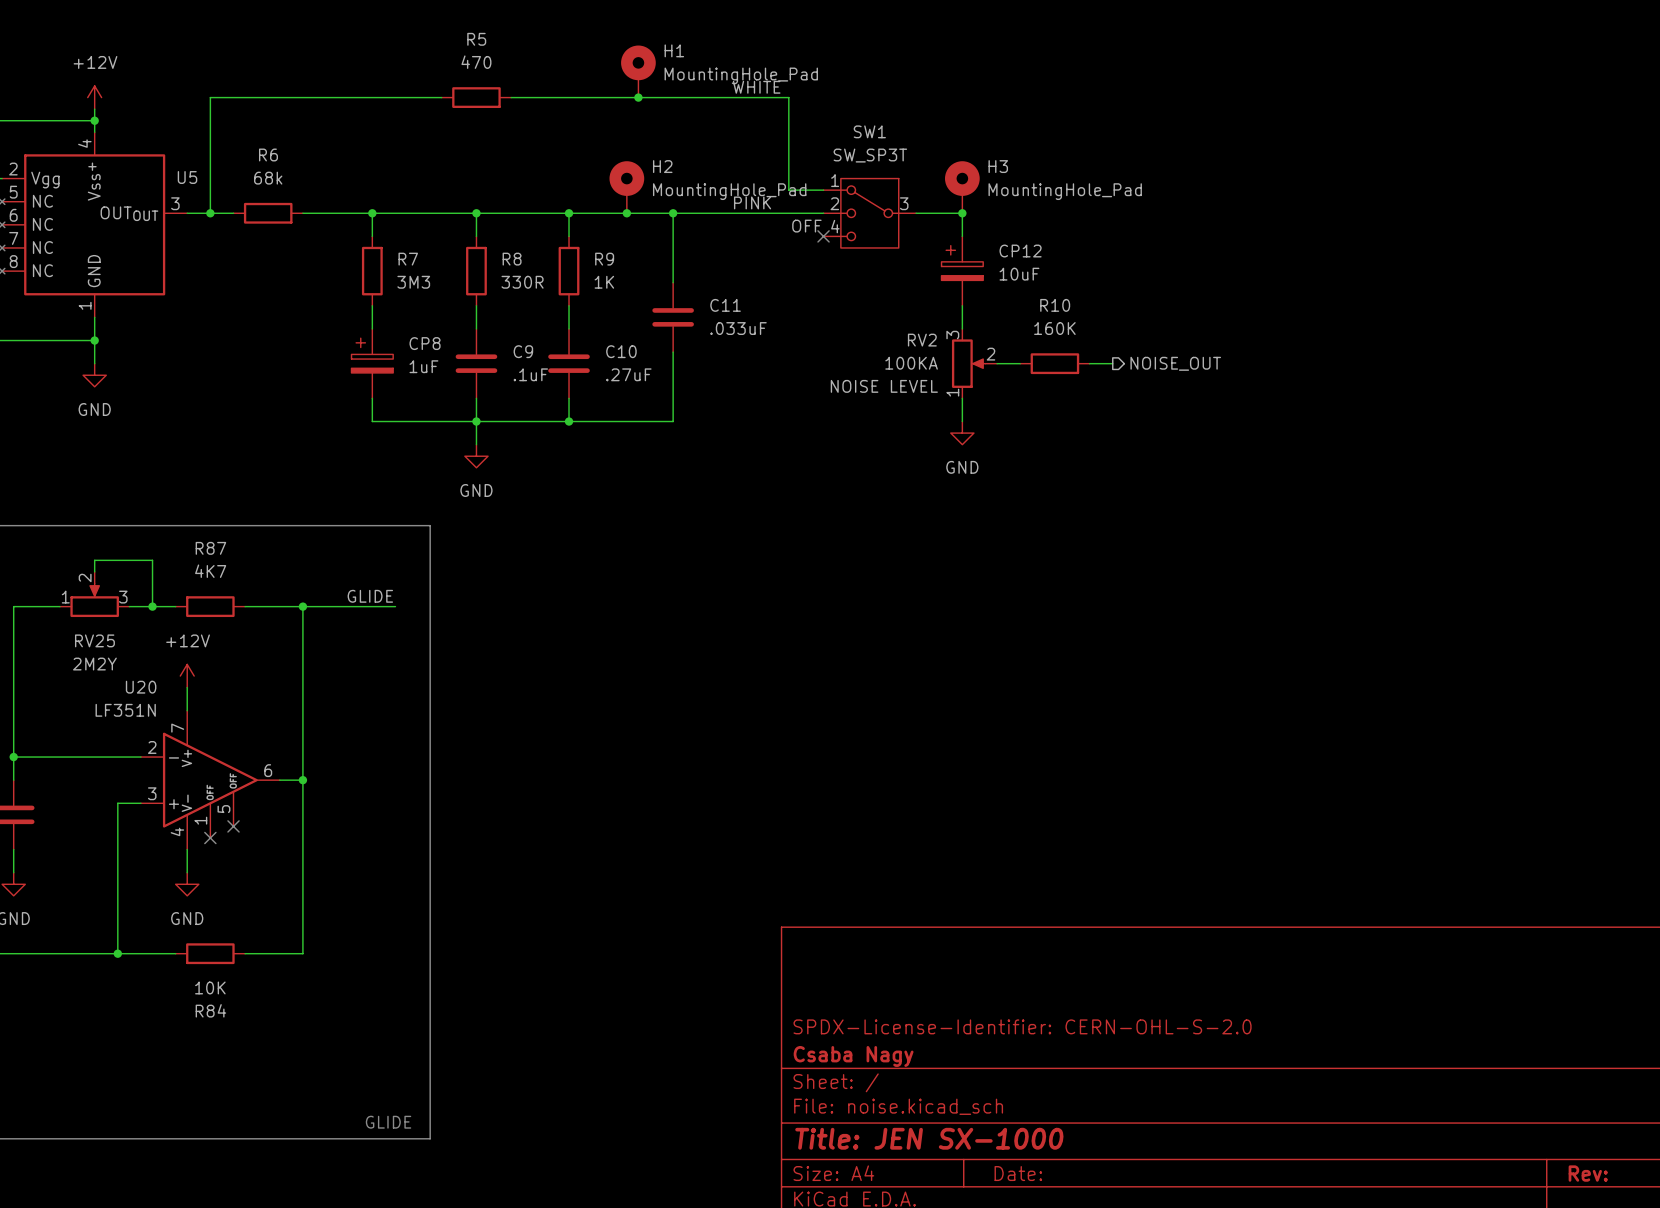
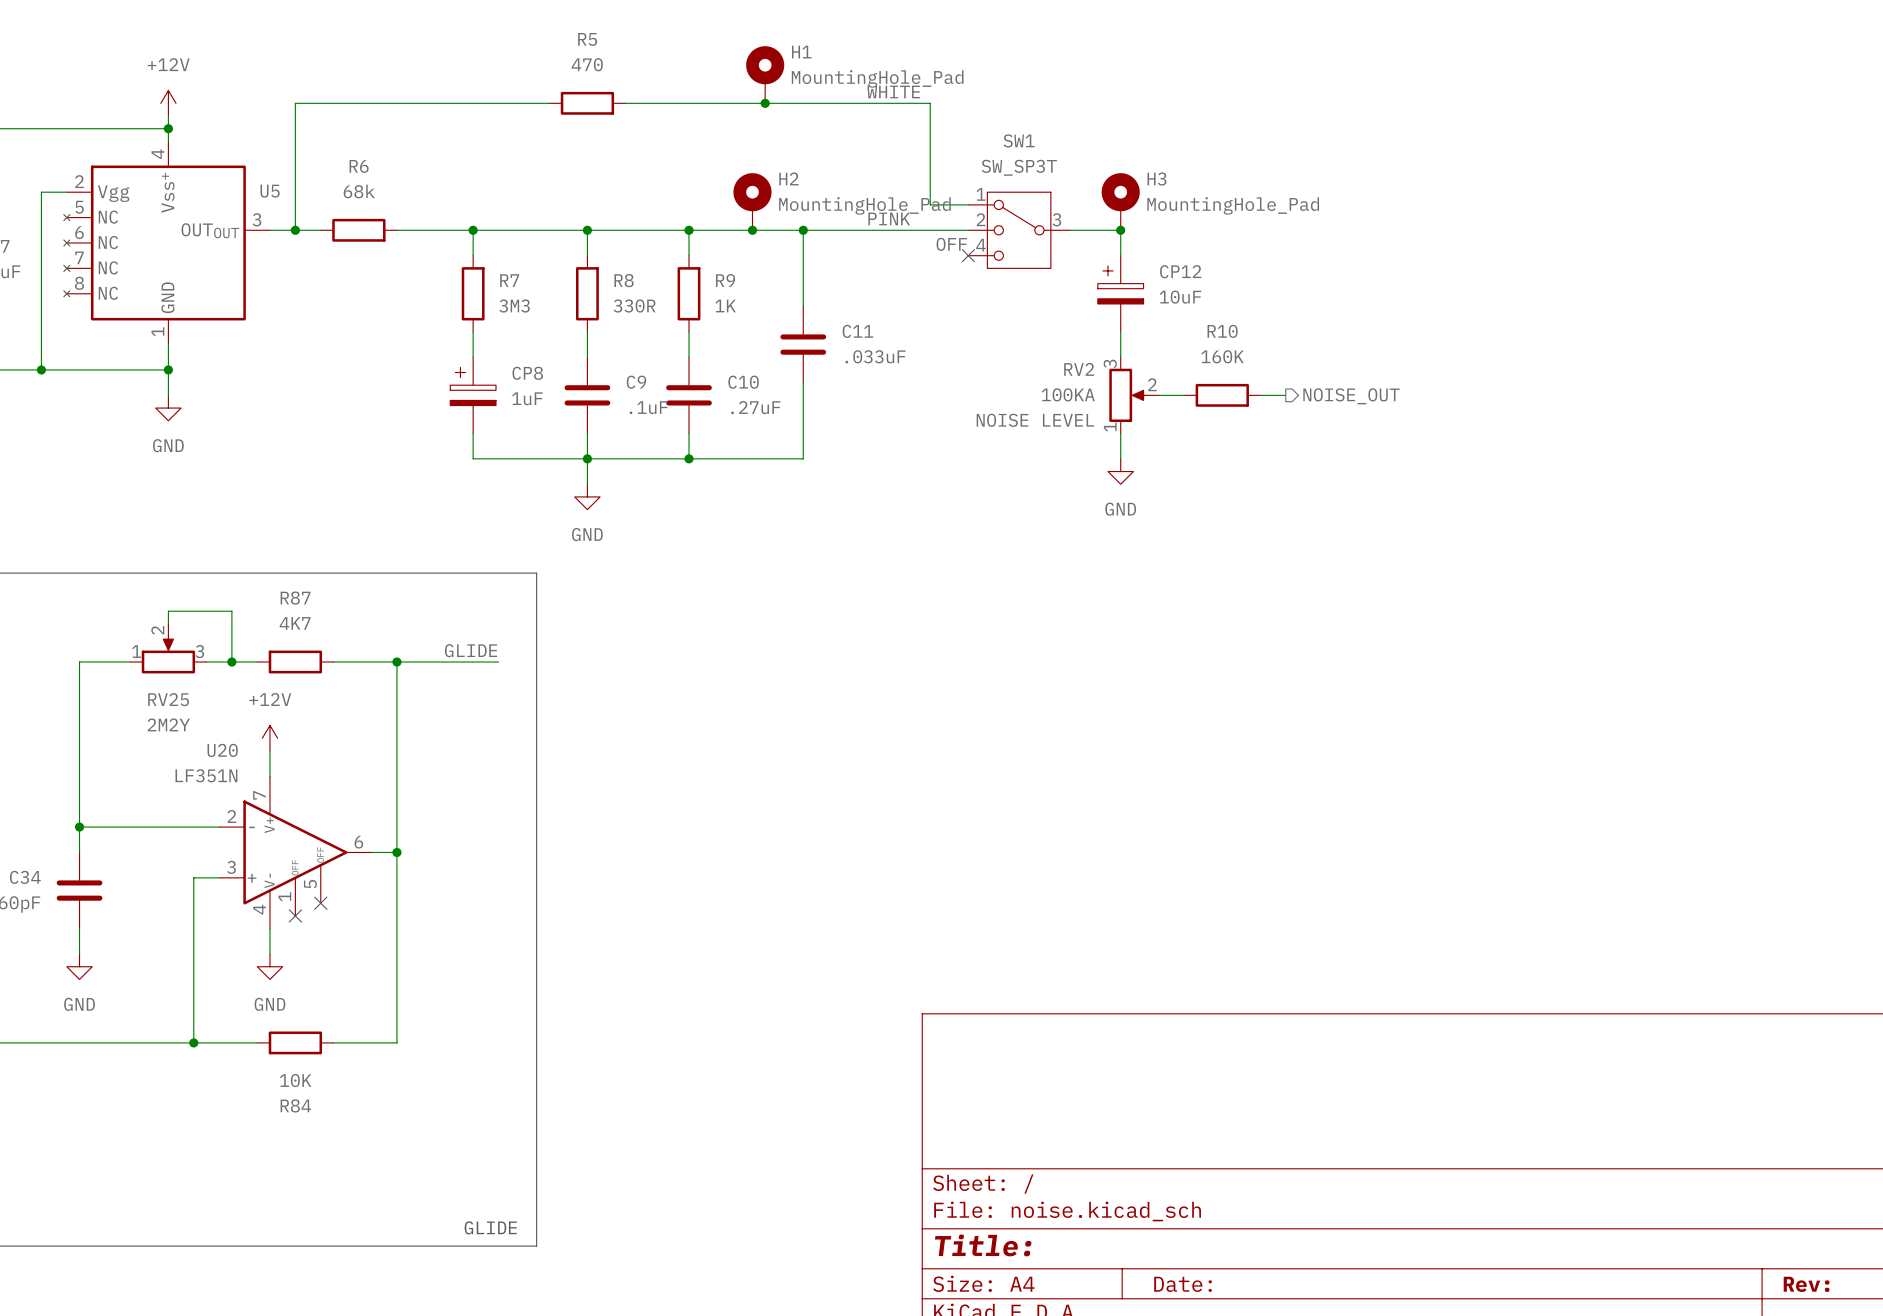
title block: SPDX-License-Identifier: CERN-OHL-S-2.0 (1022, 1026) -> none
title block: Csaba Nagy (853, 1056) -> none
title block: Title: JEN SX-1000 (929, 1138) -> Title: (983, 1245)

